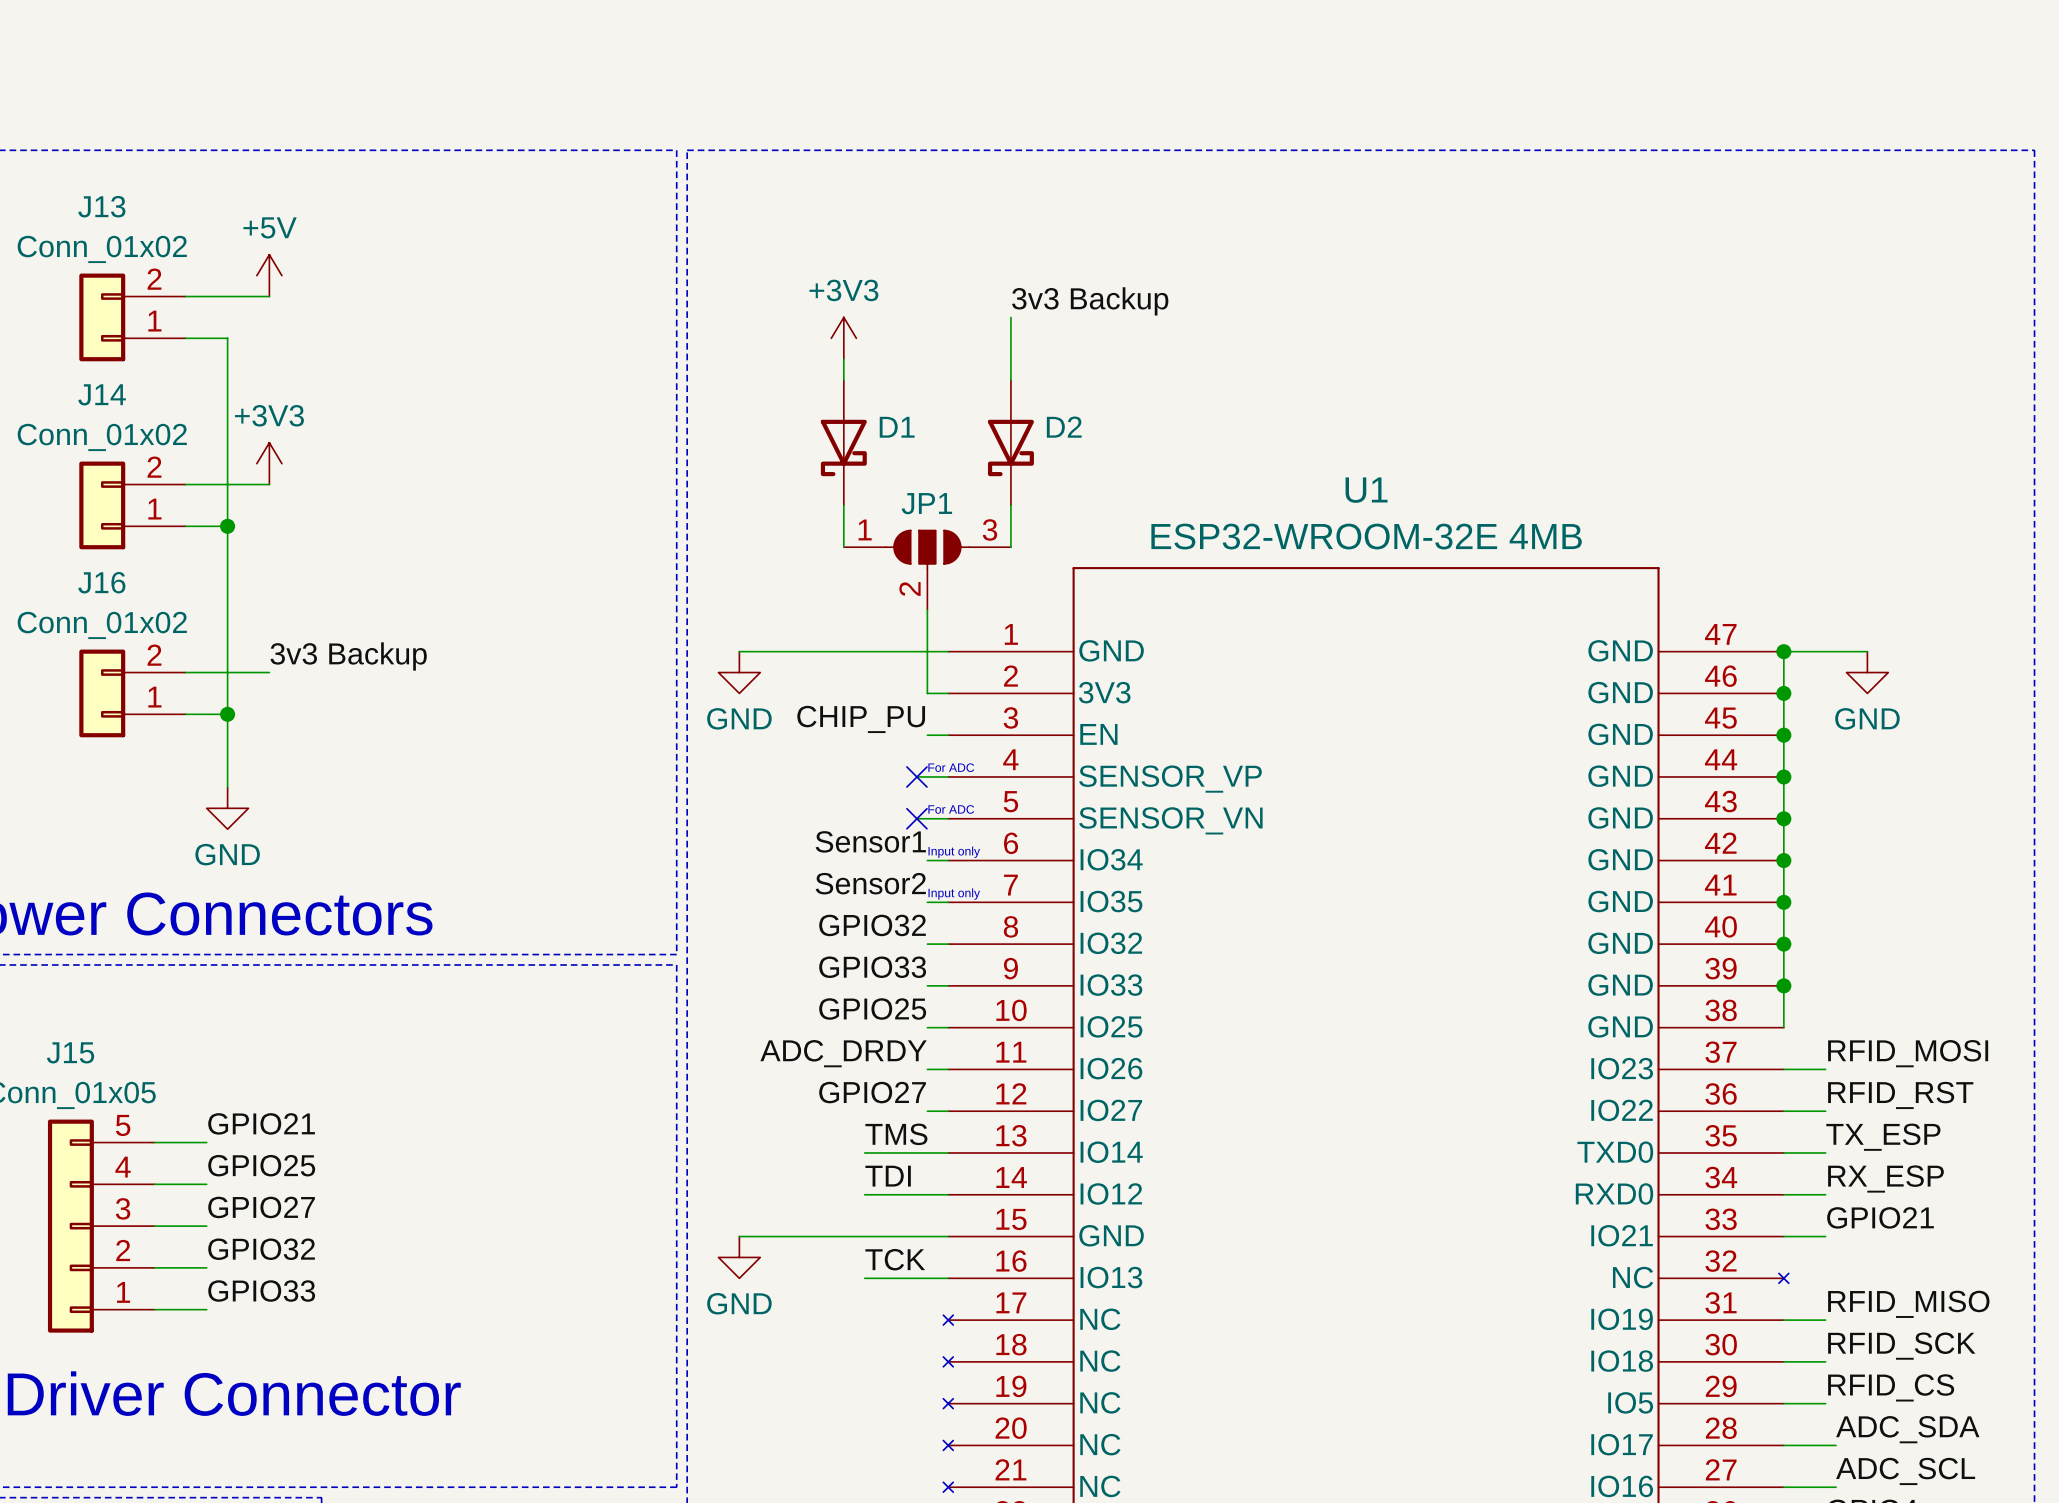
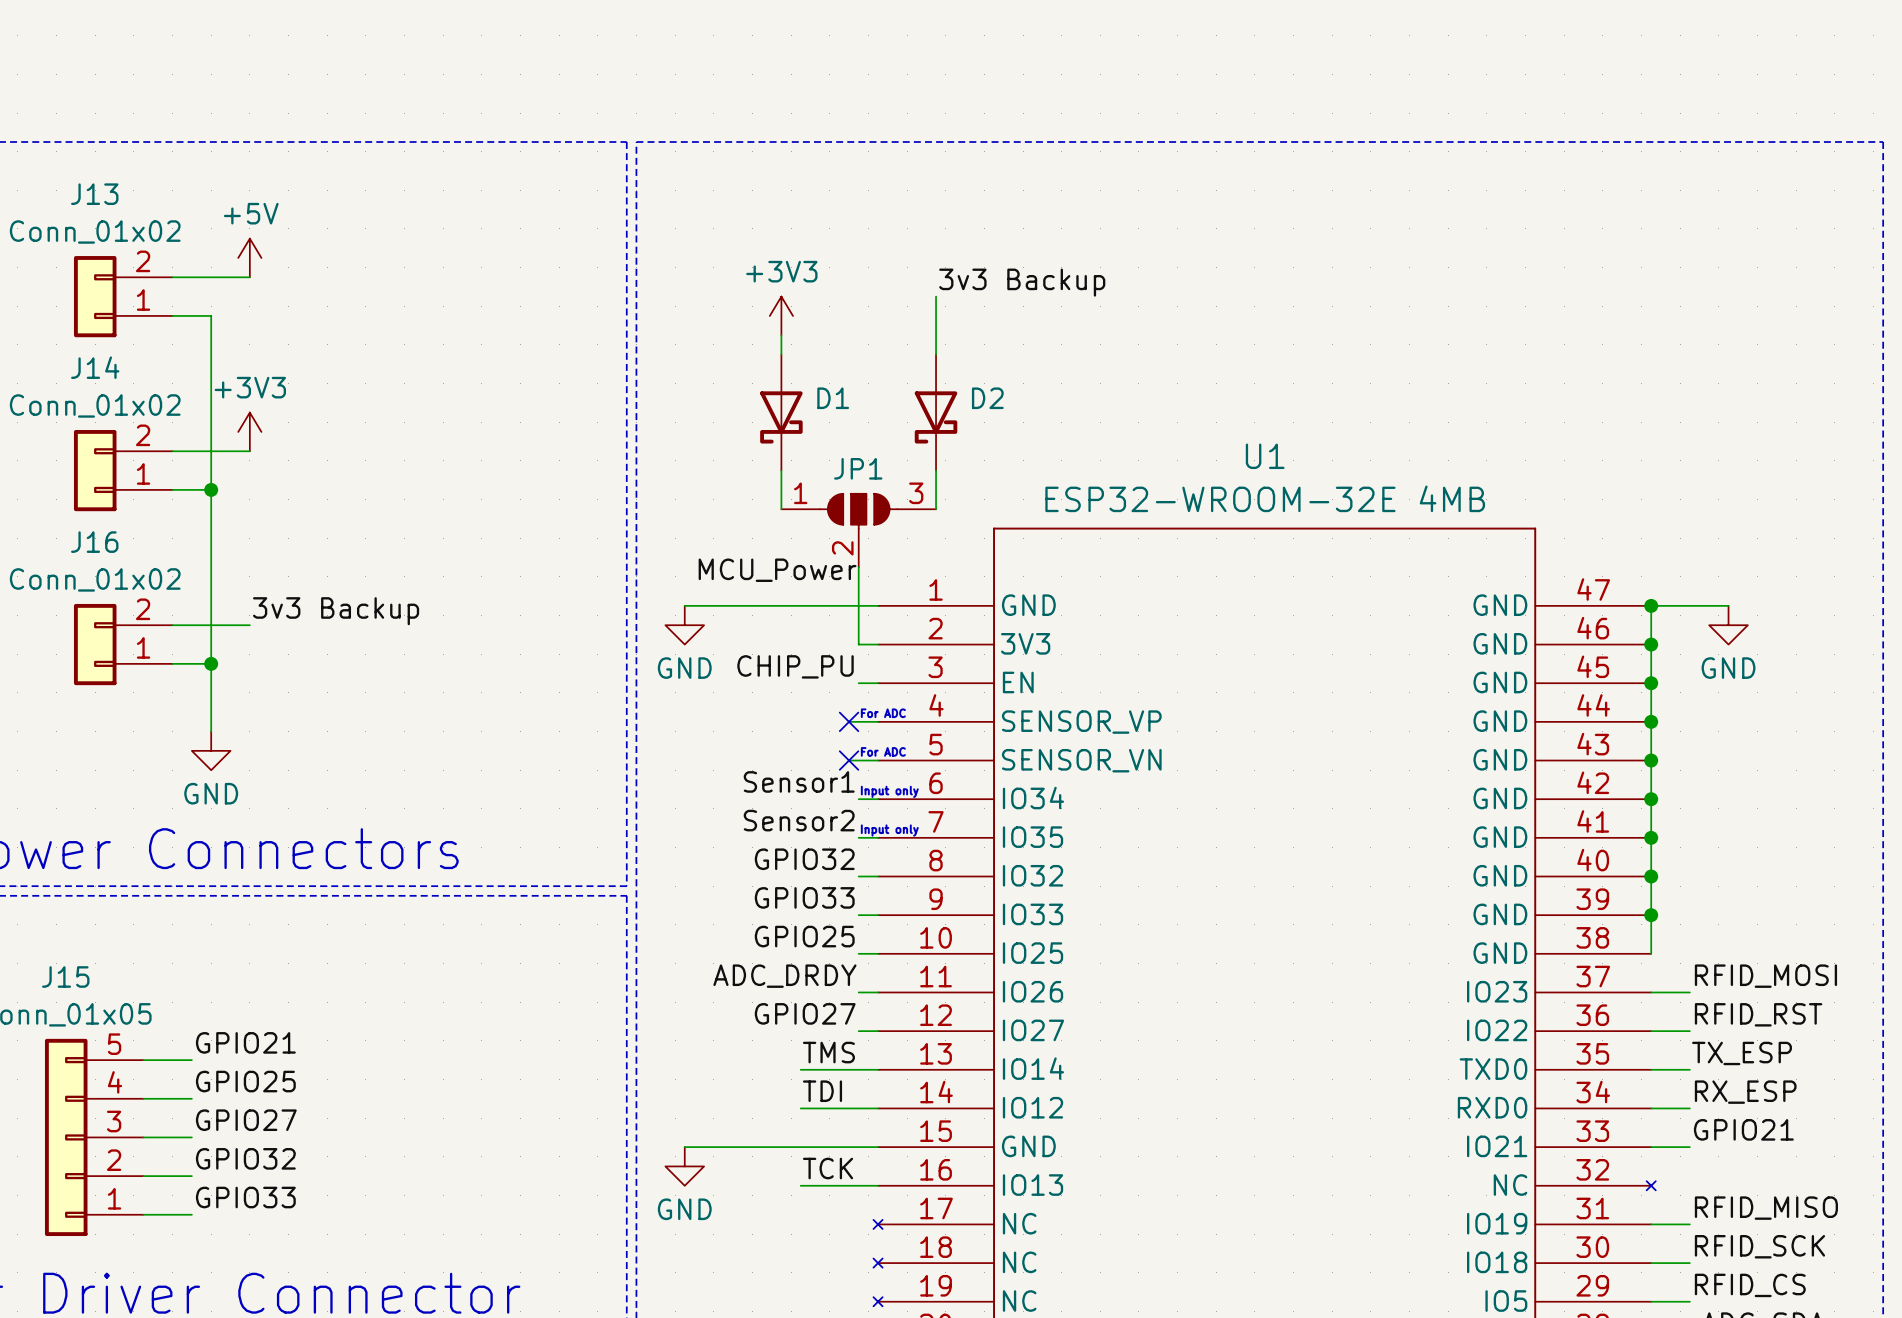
label: none -> MCU_Power (777, 570)

